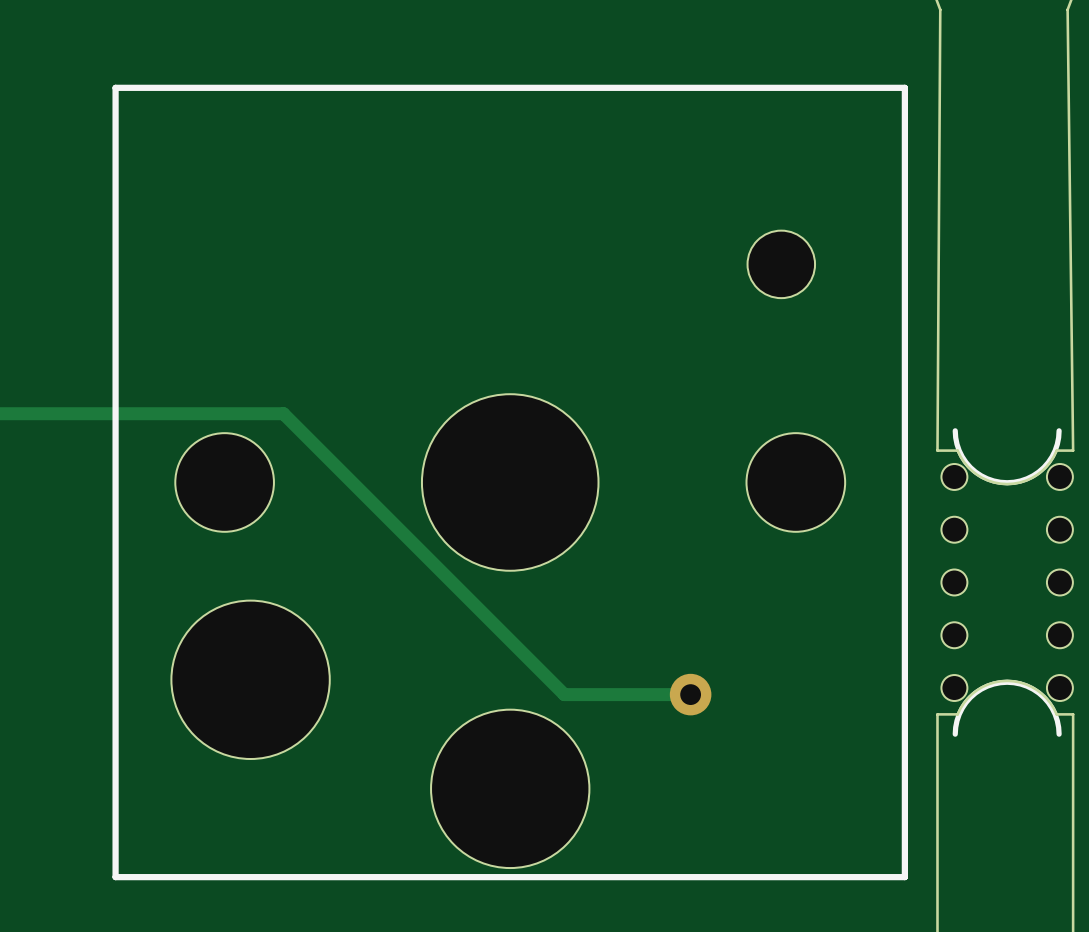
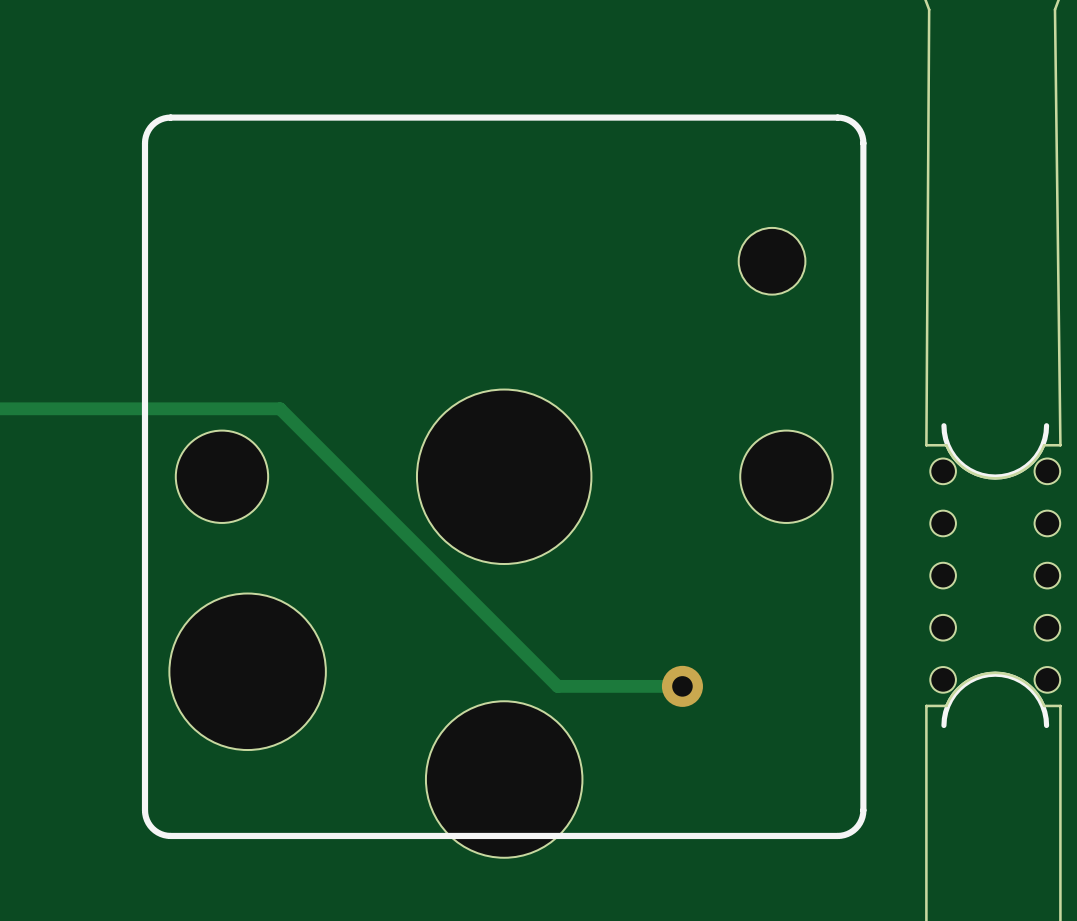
part footprint: [112, 84, 908, 881] -> [141, 114, 867, 858]

